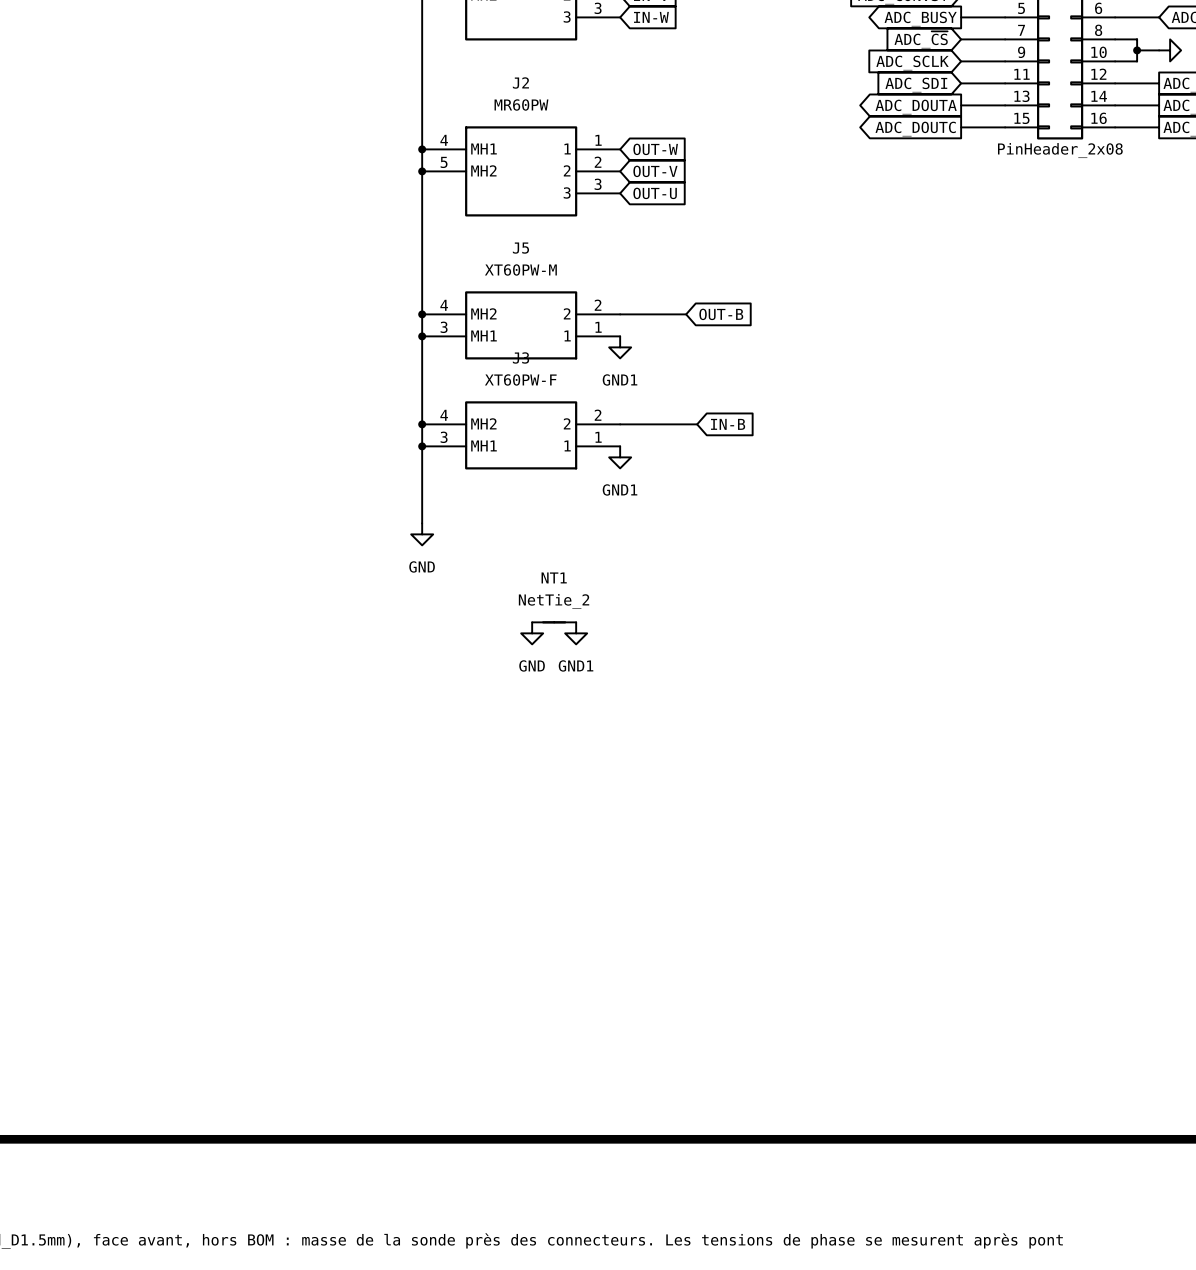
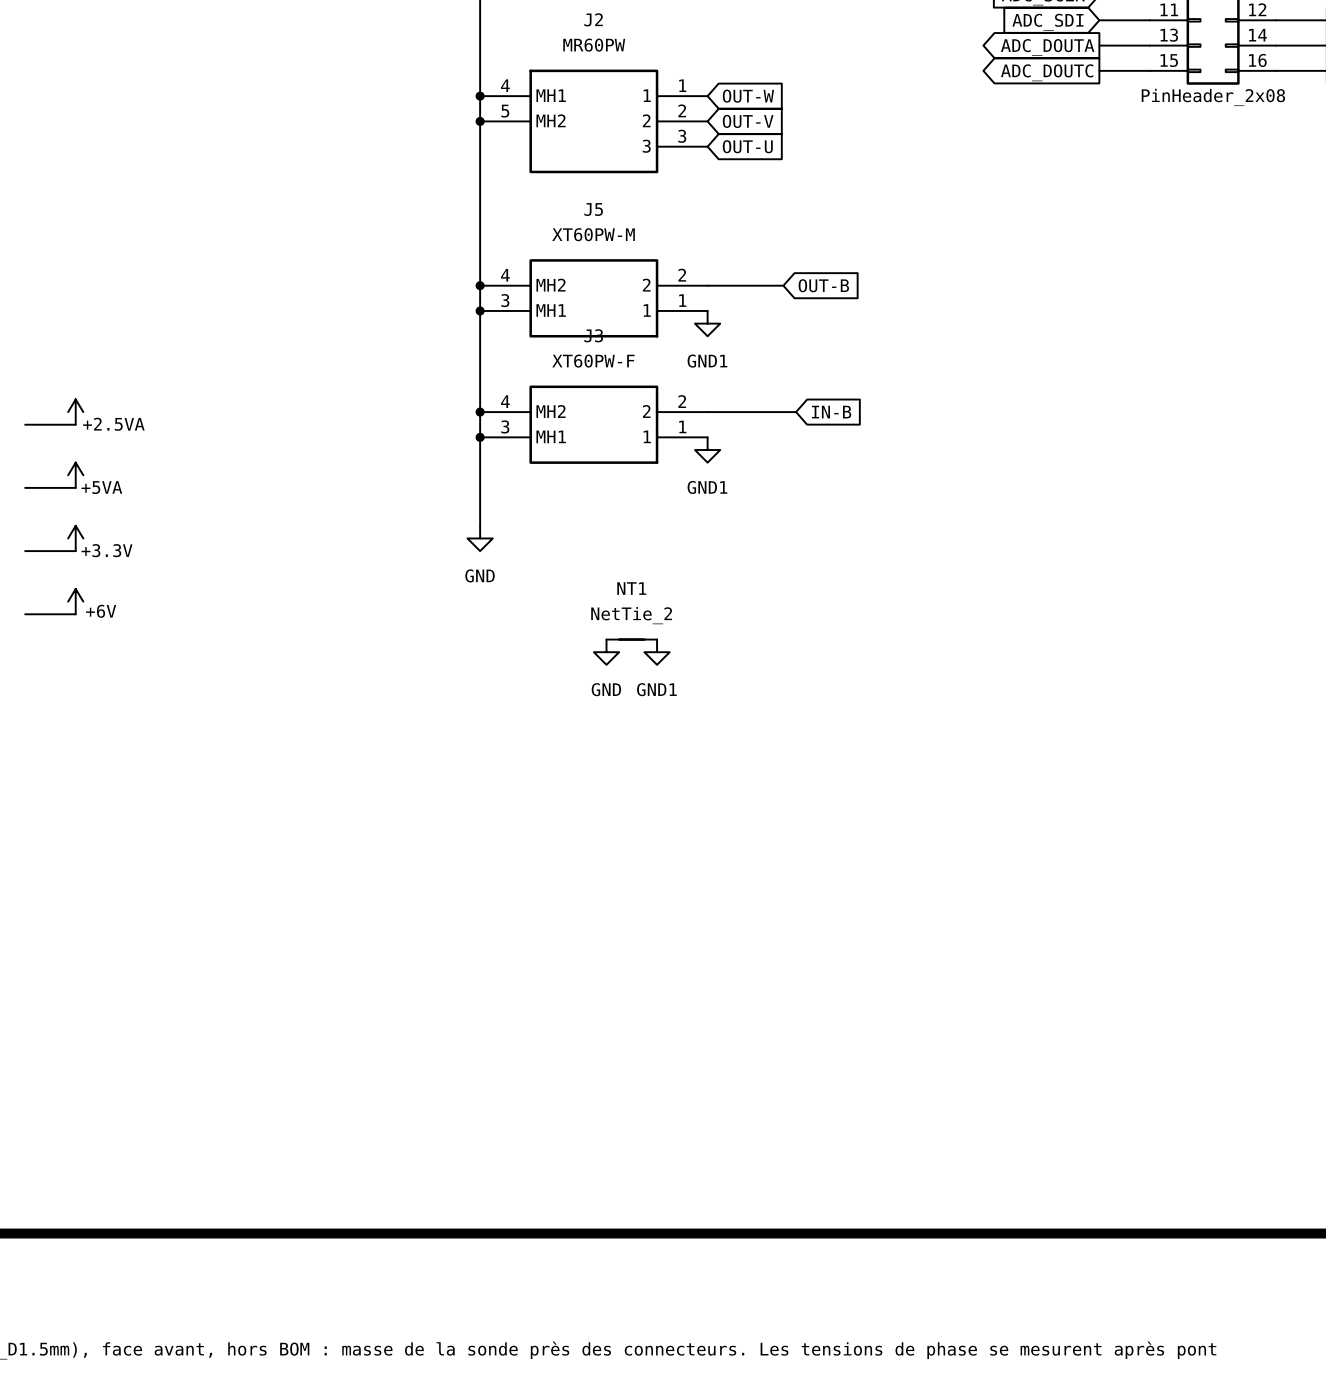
power symbol: none -> +2.5VA (75, 412)
wire: none -> (25, 424) (75, 424)
power symbol: none -> +5VA (75, 475)
wire: none -> (25, 487) (75, 487)
power symbol: none -> +3.3V (75, 538)
wire: none -> (25, 551) (75, 551)
power symbol: none -> +6V (75, 601)
wire: none -> (25, 614) (75, 614)

